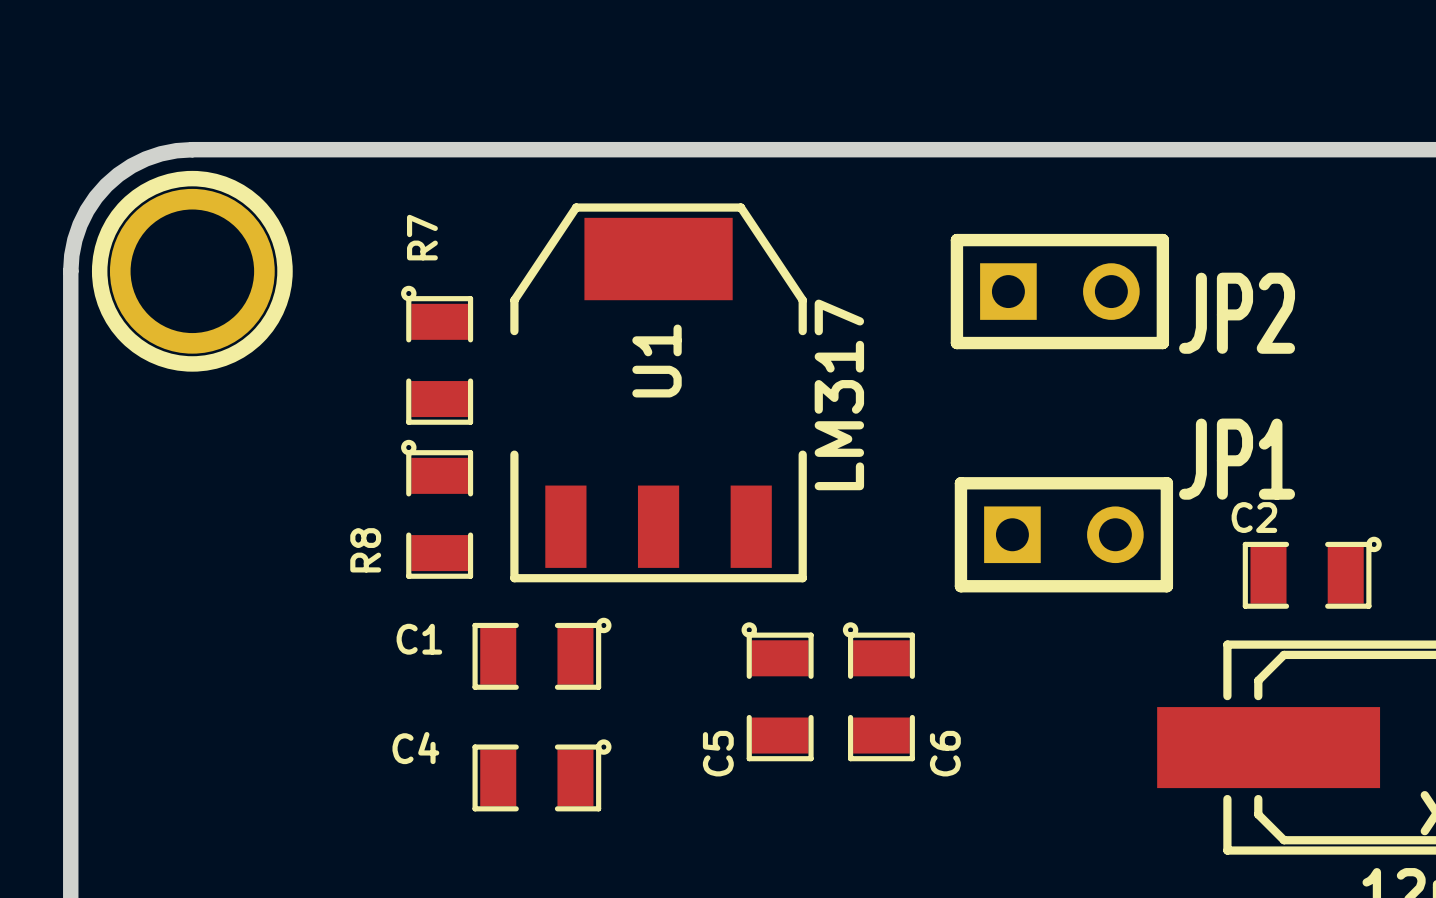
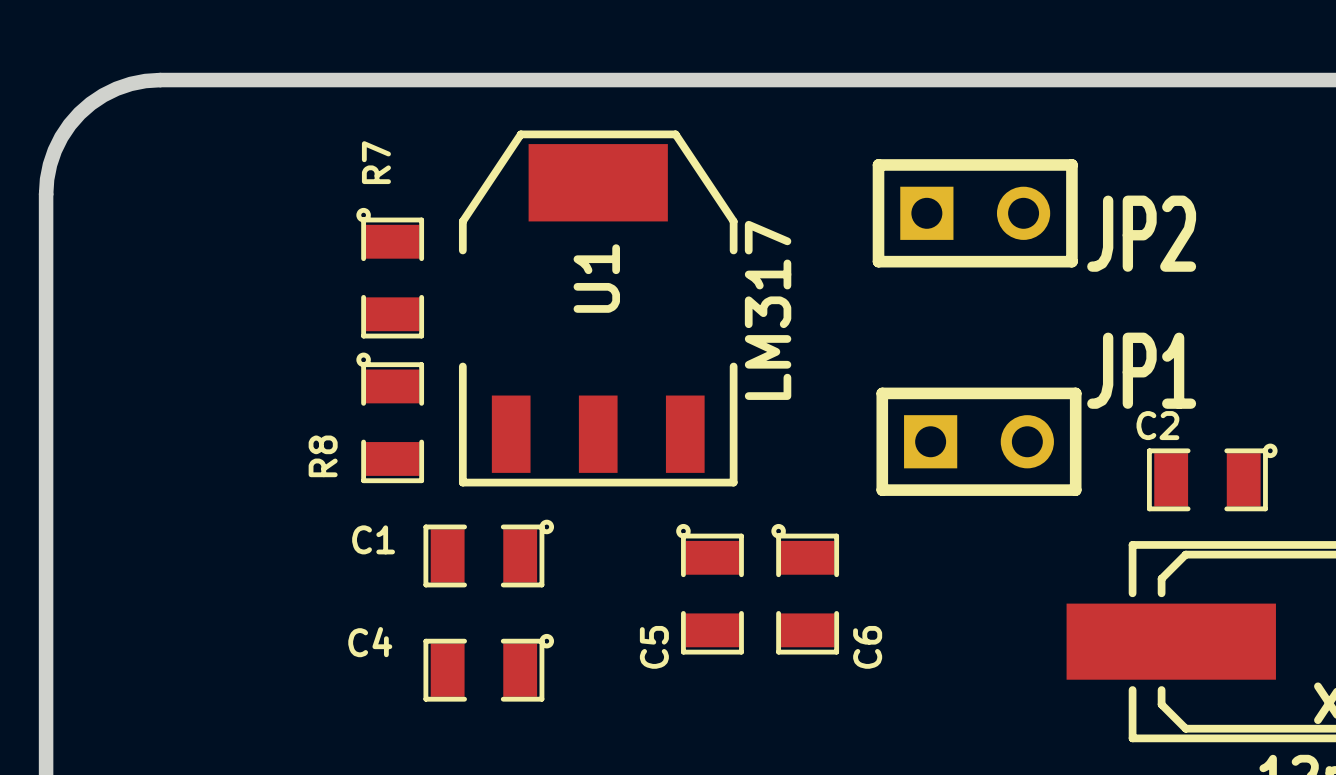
part: (192, 271) -> none

